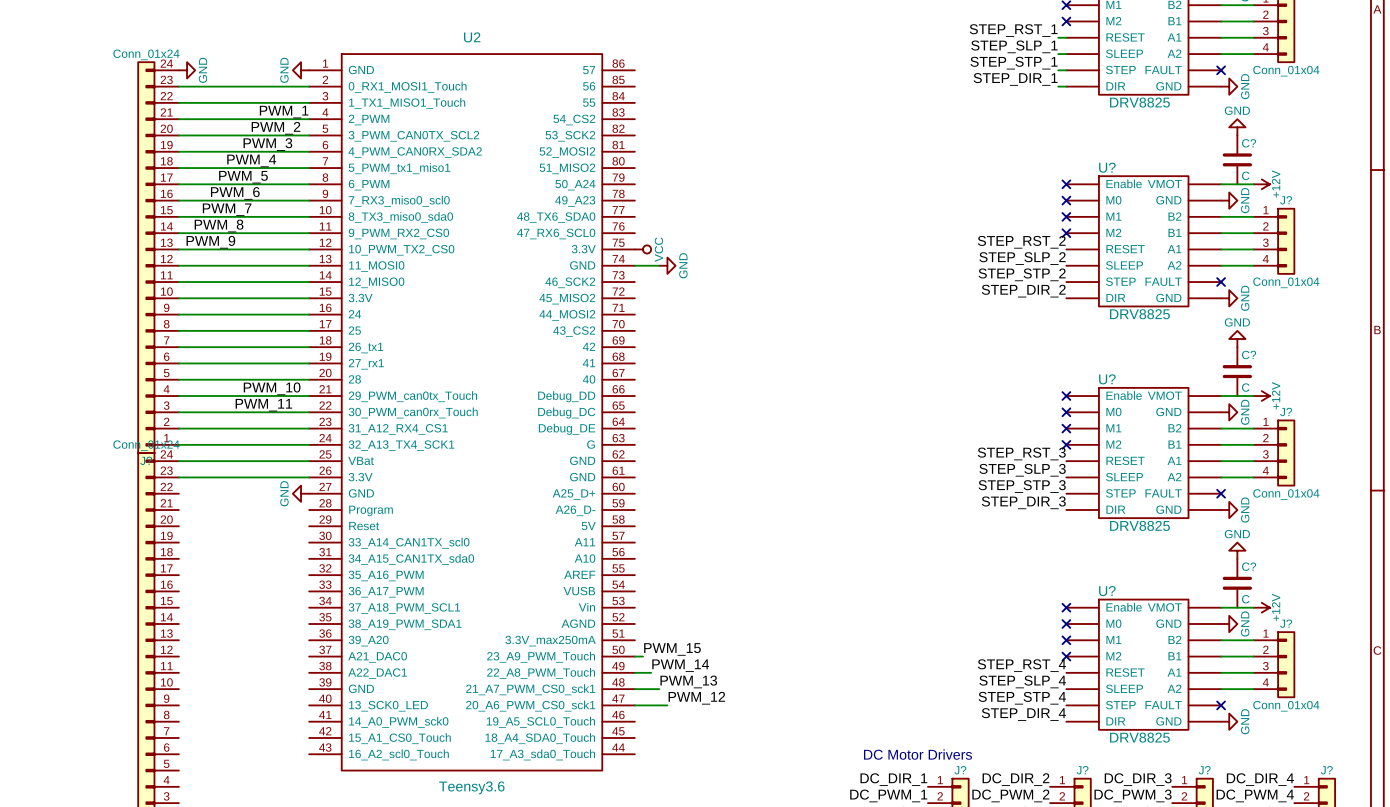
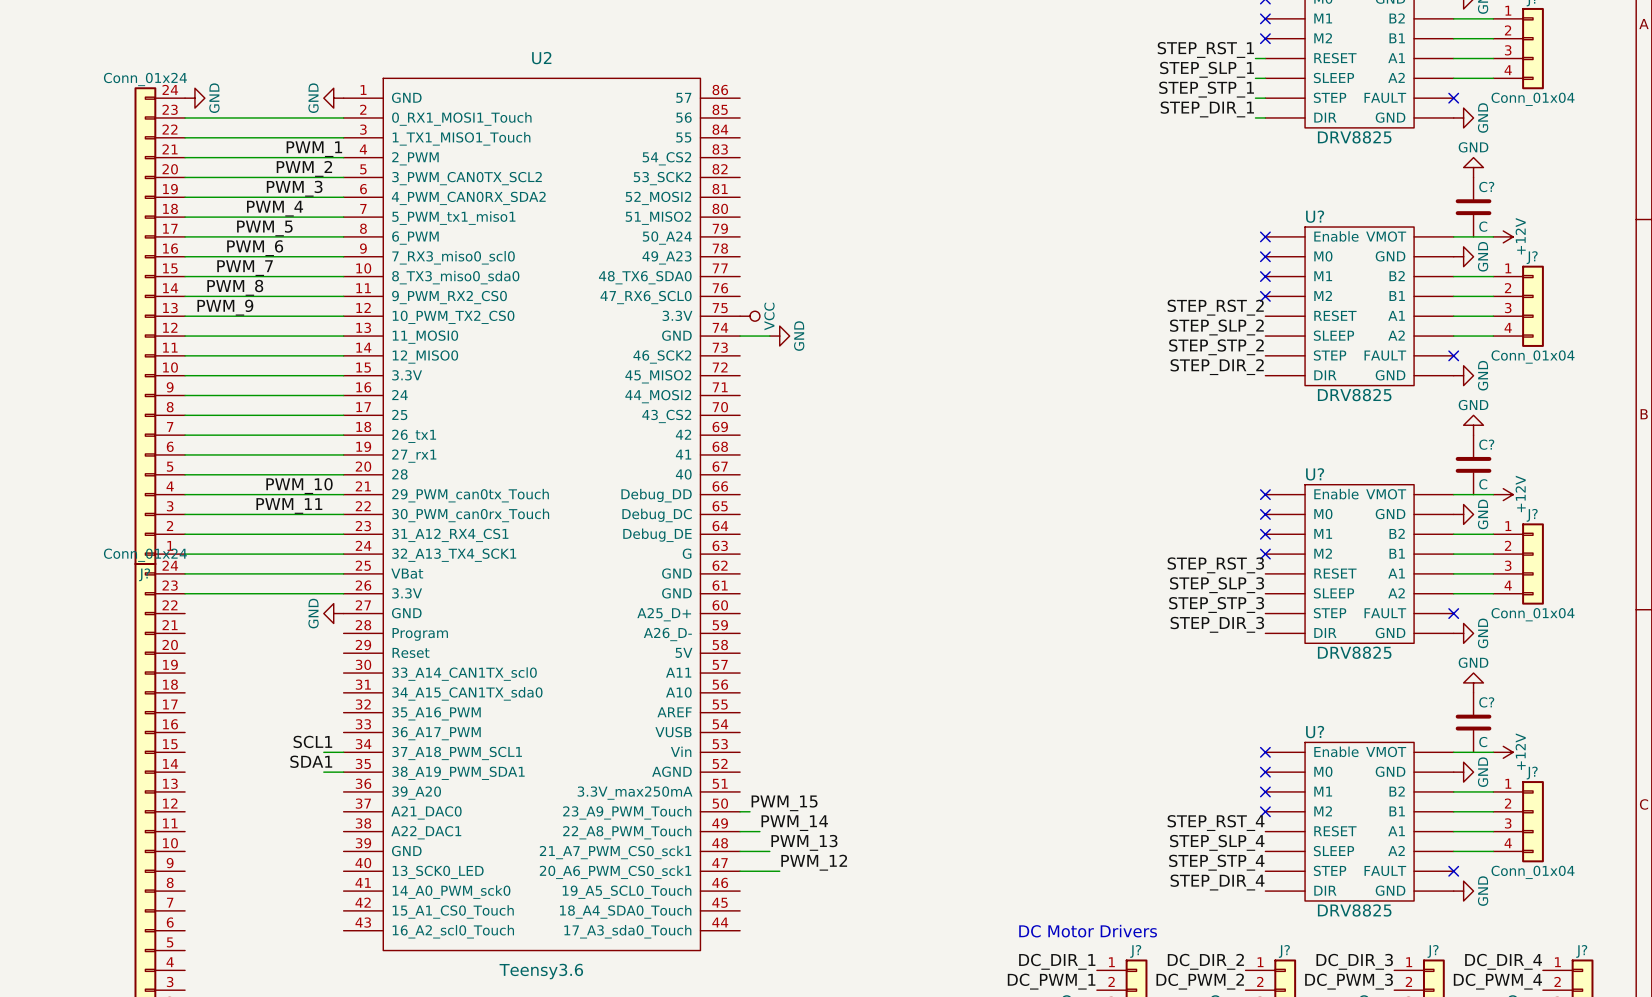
label: none -> SCL1 (312, 741)
wire: none -> (323, 752) (343, 752)
label: none -> SDA1 (311, 761)
wire: none -> (323, 772) (343, 772)

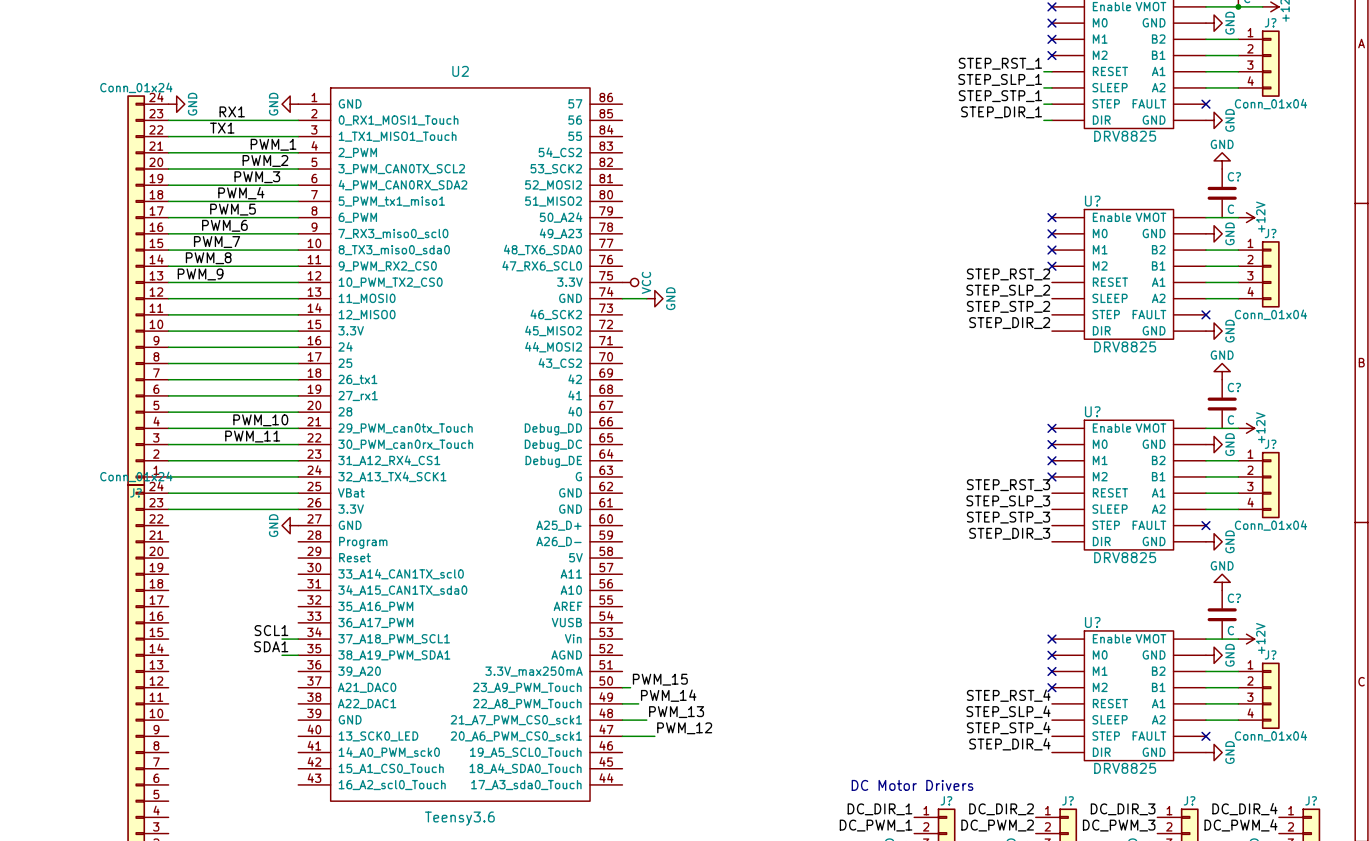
label: none -> RX1 (232, 111)
label: none -> TX1 (222, 128)

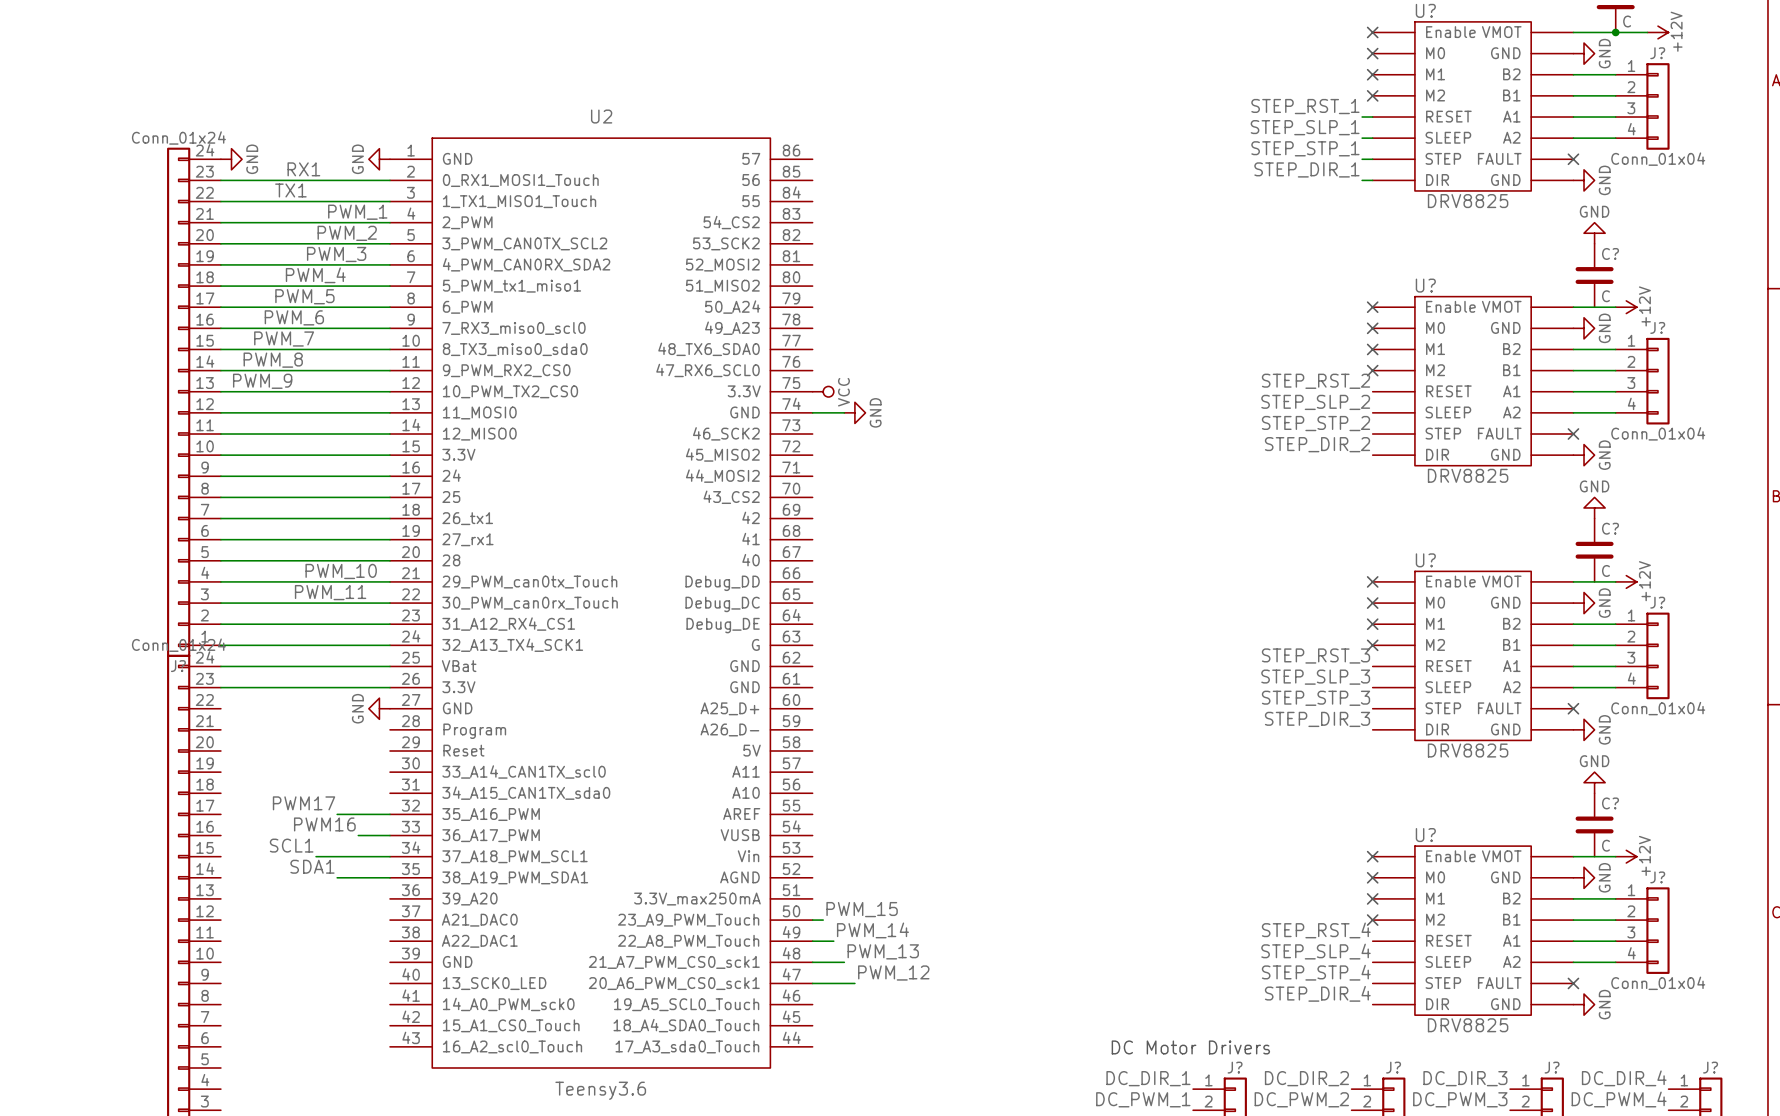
label: none -> PWM17 (304, 803)
wire: none -> (337, 814) (389, 814)
label: none -> PWM16 (324, 824)
wire: none -> (358, 835) (389, 835)
label position: SCL1 (271, 630) -> SCL1 (291, 845)
wire: none -> (316, 856) (368, 856)
label position: SDA1 (271, 646) -> SDA1 (312, 866)
wire: none -> (337, 877) (368, 877)

